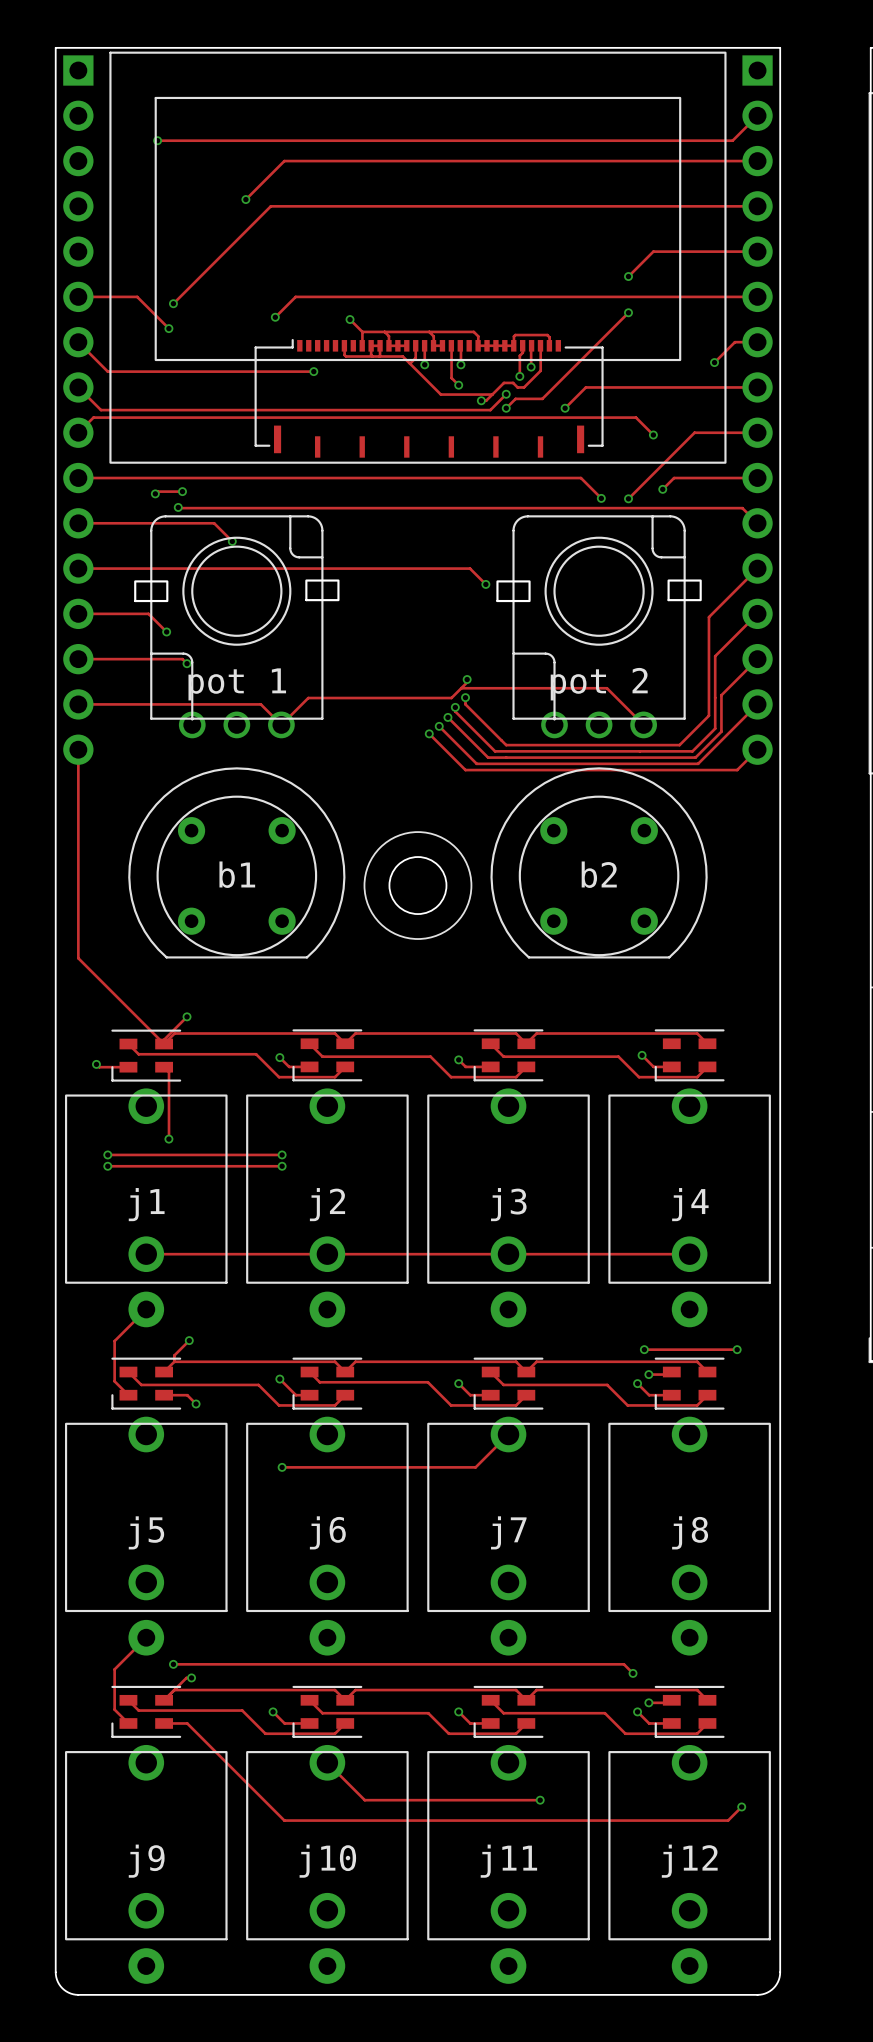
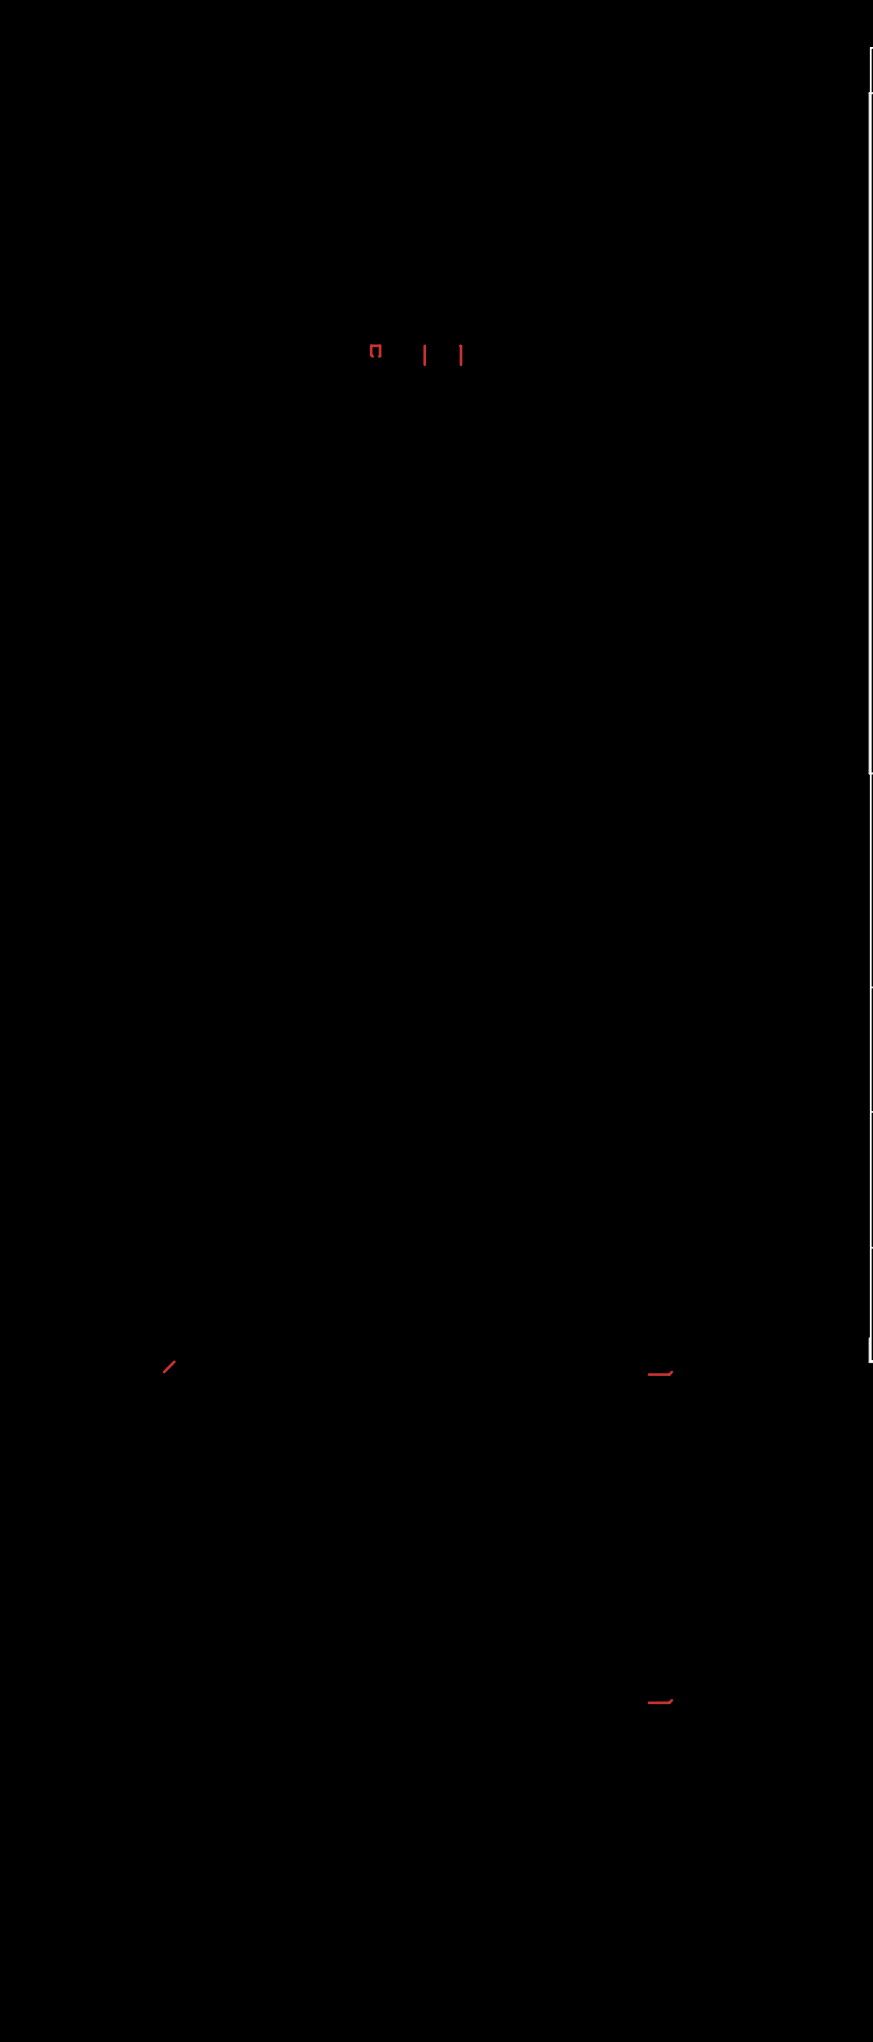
board edge: (55, 47) (56, 1979) (66, 1991) (78, 1994) (765, 1993) (776, 1984) (780, 1972) (780, 47) (55, 47) -> none
drawing: [109, 51, 727, 464] -> none
track: (757, 115) (732, 140) (157, 140) -> none
via: (157, 140) -> none
track: (757, 161) (284, 161) (245, 199) -> none
via: (245, 199) -> none
track: (757, 206) (270, 206) (173, 303) -> none
track: (757, 251) (653, 251) (628, 276) -> none
via: (628, 276) -> none
track: (78, 296) (137, 296) (168, 328) -> none
track: (757, 296) (295, 296) (275, 317) -> none
via: (173, 303) -> none
track: (628, 312) (542, 398) (515, 398) (506, 408) -> none
via: (628, 312) -> none
via: (275, 317) -> none
track: (350, 319) (362, 331) -> none
via: (350, 319) -> none
via: (168, 328) -> none
track: (362, 331) (473, 331) (478, 336) (478, 345) (513, 345) (515, 335) (547, 335) (549, 337) (549, 345) -> none
track: (362, 331) (362, 345) -> none
track: (384, 331) (388, 336) (388, 345) (406, 345) -> none
track: (429, 331) (433, 336) (433, 345) (442, 345) -> none
track: (78, 342) (107, 371) (313, 371) -> none
track: (757, 342) (734, 342) (714, 362) -> none
track: (344, 345) (345, 356) (402, 356) (440, 394) (492, 394) -> none
track: (415, 345) (415, 358) (410, 363) -> none
track: (451, 345) (451, 378) (458, 385) -> none
track: (522, 345) (522, 352) (519, 355) (519, 376) -> none
track: (531, 345) (531, 367) -> none
track: (540, 345) (540, 370) (524, 387) (517, 387) (513, 382) (503, 382) (486, 400) (481, 400) -> none
via: (714, 362) -> none
via: (424, 364) -> none
via: (460, 364) -> none
via: (531, 367) -> none
via: (313, 371) -> none
via: (519, 376) -> none
via: (458, 385) -> none
track: (78, 387) (101, 410) (490, 410) (506, 394) -> none
track: (757, 387) (585, 387) (565, 408) -> none
via: (506, 394) -> none
part: (429, 398) -> none
via: (481, 400) -> none
via: (506, 408) -> none
via: (565, 408) -> none
part: (78, 410) -> none
part: (757, 410) -> none
track: (78, 432) (93, 417) (635, 417) (653, 435) -> none
track: (757, 432) (694, 432) (628, 498) -> none
via: (653, 435) -> none
track: (78, 478) (580, 478) (601, 498) -> none
track: (757, 478) (674, 478) (662, 489) -> none
via: (662, 489) -> none
track: (182, 491) (157, 491) (155, 493) -> none
via: (182, 491) -> none
via: (155, 493) -> none
via: (601, 498) -> none
via: (628, 498) -> none
track: (178, 507) (742, 508) (757, 523) -> none
via: (178, 507) -> none
track: (78, 523) (214, 523) (232, 541) -> none
via: (232, 541) -> none
track: (78, 568) (470, 568) (485, 584) -> none
track: (757, 568) (708, 617) (708, 715) (679, 745) (506, 745) (465, 704) (465, 697) -> none
via: (485, 584) -> none
track: (78, 613) (148, 613) (166, 631) -> none
track: (757, 613) (715, 656) (715, 728) (692, 751) (495, 751) (455, 711) (455, 707) -> none
part: (236, 626) -> none
part: (599, 626) -> none
via: (166, 631) -> none
track: (78, 659) (182, 659) (187, 663) -> none
track: (757, 659) (721, 695) (721, 731) (695, 757) (488, 757) (447, 717) -> none
via: (187, 663) -> none
track: (467, 679) (467, 682) (451, 698) (308, 698) (281, 724) (260, 704) (78, 704) -> none
via: (467, 679) -> none
text: pot 1 (237, 684) -> none
text: pot 2 (599, 684) -> none
track: (461, 688) (606, 688) (643, 724) -> none
via: (465, 697) -> none
track: (757, 704) (698, 763) (476, 763) (439, 726) -> none
via: (455, 707) -> none
via: (447, 717) -> none
via: (439, 726) -> none
track: (429, 733) (465, 770) (737, 770) (757, 749) -> none
via: (429, 733) -> none
track: (78, 749) (78, 958) (164, 1044) -> none
drawing: [363, 831, 473, 940] -> none
round board edge: [388, 856, 448, 915] -> none
part: (236, 862) -> none
part: (599, 862) -> none
text: b1 (237, 874) -> none
text: b2 (599, 874) -> none
track: (187, 1016) (164, 1039) (164, 1044) -> none
via: (187, 1016) -> none
track: (309, 1043) (322, 1056) (430, 1056) (451, 1077) (516, 1077) (526, 1066) -> none
track: (490, 1043) (503, 1056) (618, 1056) (639, 1077) (697, 1077) (707, 1066) -> none
track: (707, 1043) (697, 1033) (536, 1033) (526, 1043) (516, 1033) (355, 1033) (345, 1043) (334, 1033) (174, 1033) (164, 1044) -> none
track: (128, 1044) (138, 1054) (256, 1054) (279, 1077) (334, 1077) (345, 1066) -> none
part: (146, 1055) -> none
part: (327, 1055) -> none
part: (508, 1055) -> none
track: (642, 1055) (653, 1066) (671, 1066) -> none
via: (642, 1055) -> none
part: (689, 1055) -> none
track: (279, 1057) (289, 1066) (309, 1066) -> none
via: (279, 1057) -> none
track: (458, 1059) (465, 1066) (490, 1066) -> none
via: (458, 1059) -> none
track: (96, 1064) (99, 1067) (128, 1067) -> none
via: (96, 1064) -> none
track: (164, 1067) (169, 1072) (169, 1139) -> none
via: (168, 1139) -> none
track: (107, 1154) (282, 1154) -> none
via: (107, 1154) -> none
via: (282, 1154) -> none
track: (107, 1166) (282, 1166) -> none
via: (107, 1166) -> none
via: (282, 1166) -> none
text: j1 (146, 1204) -> none
text: j2 (327, 1204) -> none
text: j3 (508, 1204) -> none
text: j4 (690, 1204) -> none
part: (146, 1207) -> none
part: (327, 1207) -> none
part: (508, 1207) -> none
part: (689, 1207) -> none
track: (146, 1254) (689, 1254) -> none
track: (146, 1309) (114, 1341) (114, 1381) (128, 1395) -> none
track: (189, 1340) (174, 1355) (174, 1361) (334, 1361) (345, 1372) (355, 1361) (516, 1361) (526, 1372) (536, 1361) (697, 1361) (707, 1372) -> none
via: (189, 1340) -> none
track: (644, 1349) (737, 1349) -> none
via: (644, 1349) -> none
via: (737, 1349) -> none
track: (128, 1372) (141, 1384) (258, 1384) (279, 1405) (334, 1405) (345, 1395) -> none
track: (309, 1372) (319, 1382) (427, 1382) (451, 1405) (516, 1405) (526, 1395) -> none
track: (490, 1372) (503, 1384) (607, 1384) (627, 1405) (697, 1405) (707, 1395) -> none
via: (648, 1374) -> none
track: (279, 1379) (295, 1395) (309, 1395) -> none
via: (279, 1379) -> none
part: (146, 1383) -> none
part: (327, 1383) -> none
track: (458, 1383) (470, 1395) (490, 1395) -> none
via: (458, 1383) -> none
part: (508, 1383) -> none
track: (637, 1383) (649, 1395) (671, 1395) -> none
via: (637, 1383) -> none
part: (689, 1383) -> none
track: (164, 1395) (187, 1395) (196, 1403) -> none
via: (196, 1403) -> none
track: (508, 1434) (475, 1467) (282, 1467) -> none
via: (282, 1467) -> none
text: j5 (146, 1532) -> none
text: j6 (327, 1532) -> none
text: j7 (508, 1532) -> none
text: j8 (690, 1532) -> none
part: (146, 1536) -> none
part: (327, 1536) -> none
part: (508, 1536) -> none
part: (689, 1536) -> none
track: (146, 1637) (114, 1669) (114, 1709) (128, 1723) -> none
track: (173, 1664) (623, 1664) (633, 1673) -> none
via: (173, 1664) -> none
via: (633, 1673) -> none
track: (191, 1677) (186, 1677) (164, 1700) -> none
via: (191, 1677) -> none
track: (174, 1690) (334, 1690) (345, 1700) (355, 1690) (516, 1690) (526, 1700) (536, 1690) (697, 1690) (707, 1700) -> none
track: (128, 1700) (138, 1710) (242, 1710) (265, 1733) (334, 1733) (345, 1723) -> none
track: (309, 1700) (322, 1713) (428, 1713) (448, 1733) (516, 1733) (526, 1723) -> none
track: (490, 1700) (503, 1713) (604, 1713) (625, 1733) (697, 1733) (707, 1723) -> none
via: (648, 1702) -> none
part: (146, 1711) -> none
track: (273, 1711) (284, 1723) (309, 1723) -> none
via: (273, 1711) -> none
part: (327, 1711) -> none
track: (458, 1711) (470, 1723) (490, 1723) -> none
via: (458, 1711) -> none
part: (508, 1711) -> none
track: (637, 1711) (649, 1723) (671, 1723) -> none
via: (637, 1711) -> none
part: (689, 1711) -> none
track: (164, 1723) (187, 1723) (284, 1820) (728, 1820) (741, 1806) -> none
track: (327, 1762) (364, 1800) (540, 1800) -> none
via: (540, 1800) -> none
via: (741, 1806) -> none
text: j9 (146, 1861) -> none
text: j10 (327, 1861) -> none
text: j11 (508, 1861) -> none
text: j12 (689, 1861) -> none
part: (146, 1864) -> none
part: (327, 1864) -> none
part: (508, 1864) -> none
part: (689, 1864) -> none

